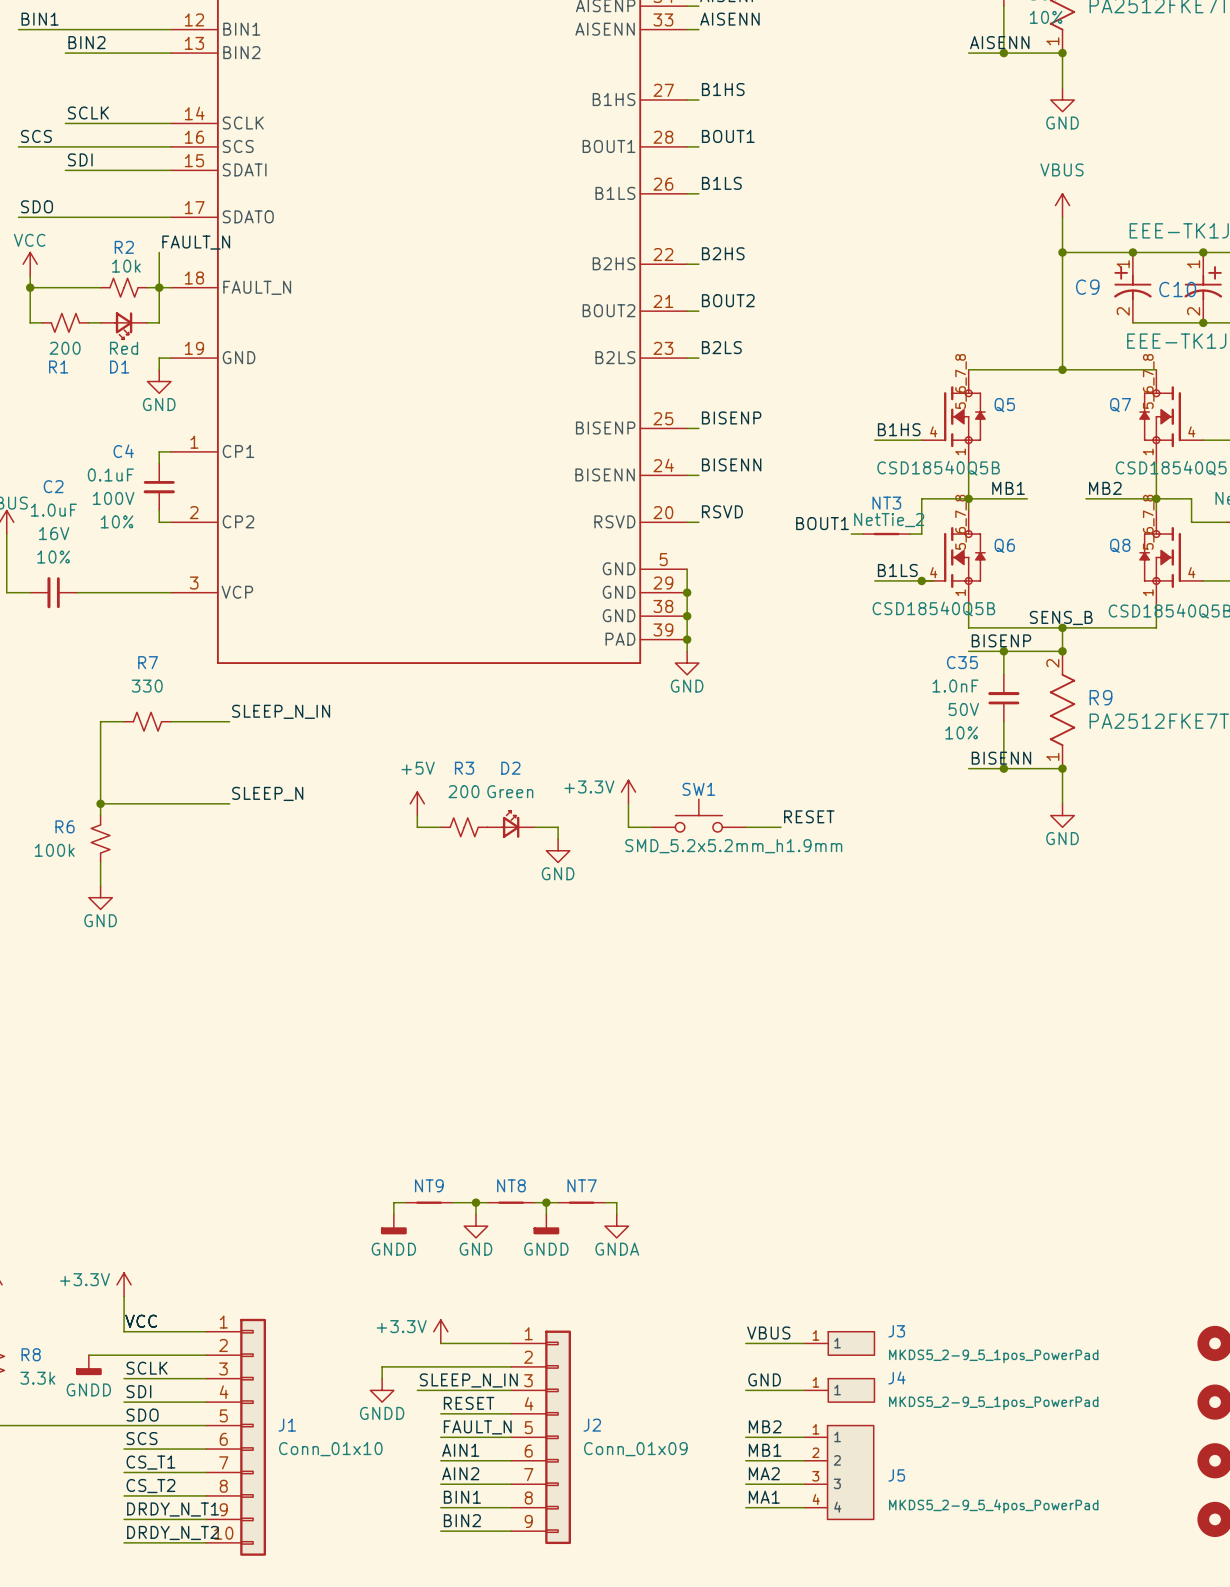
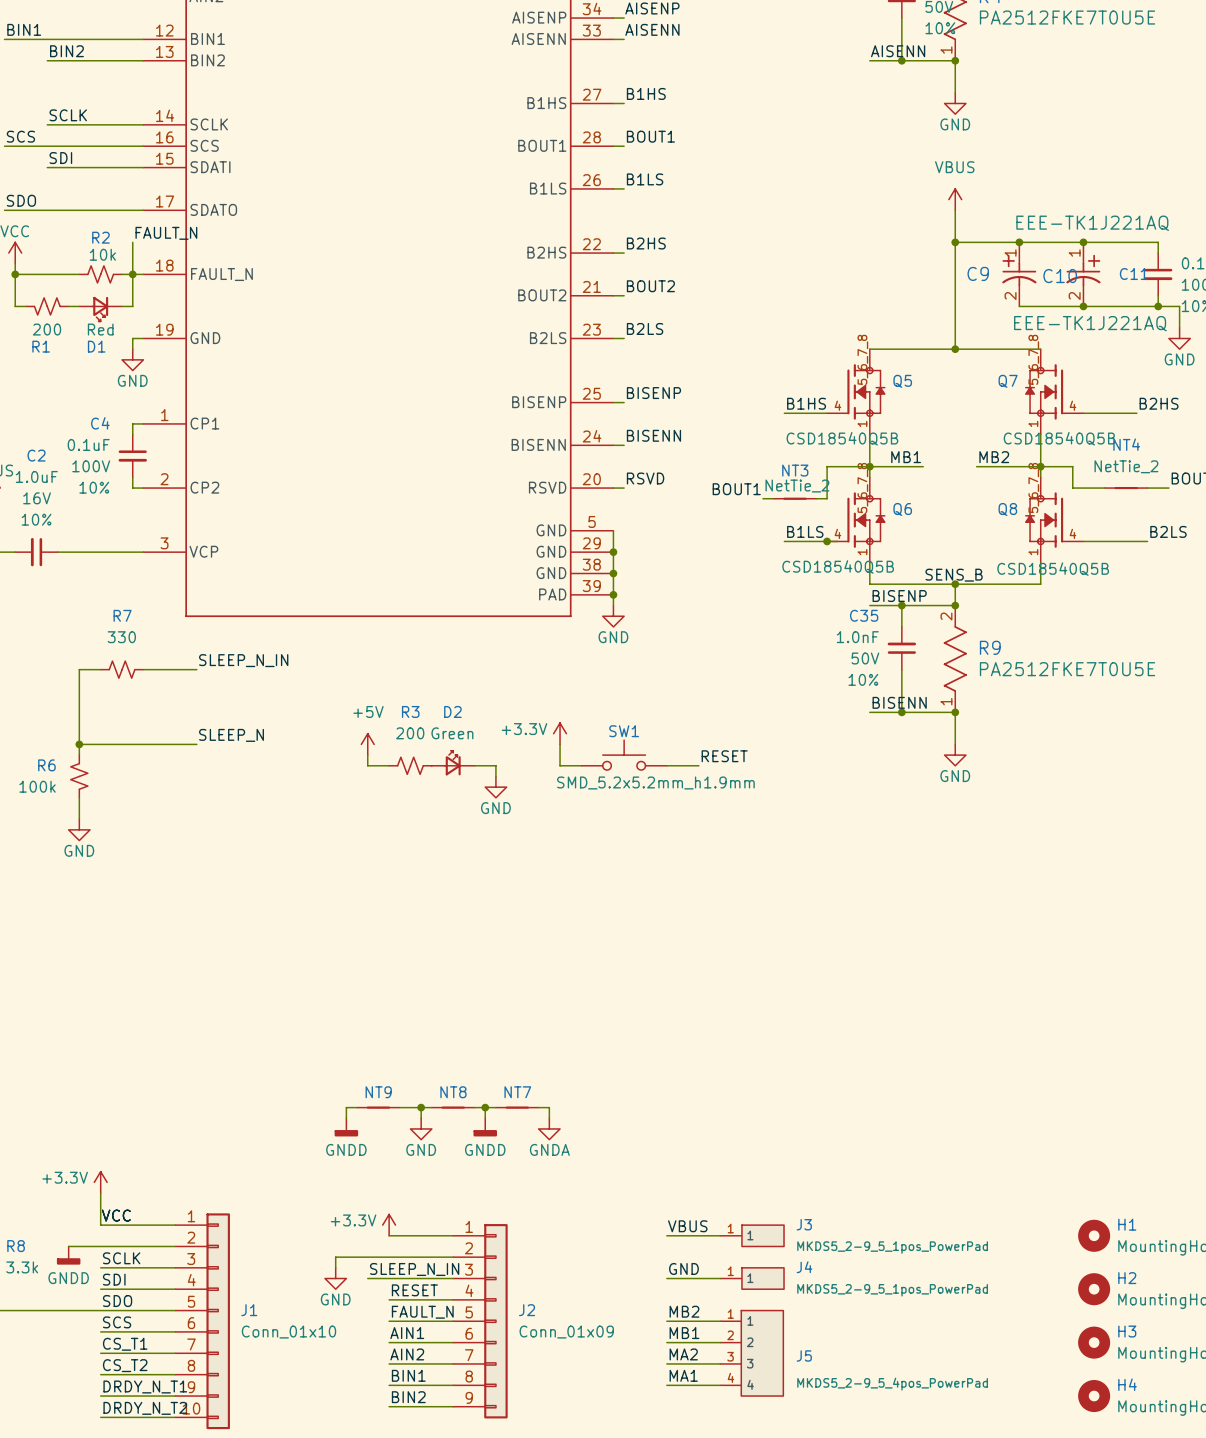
power symbol: GNDD (382, 1390) -> GND (335, 1278)

